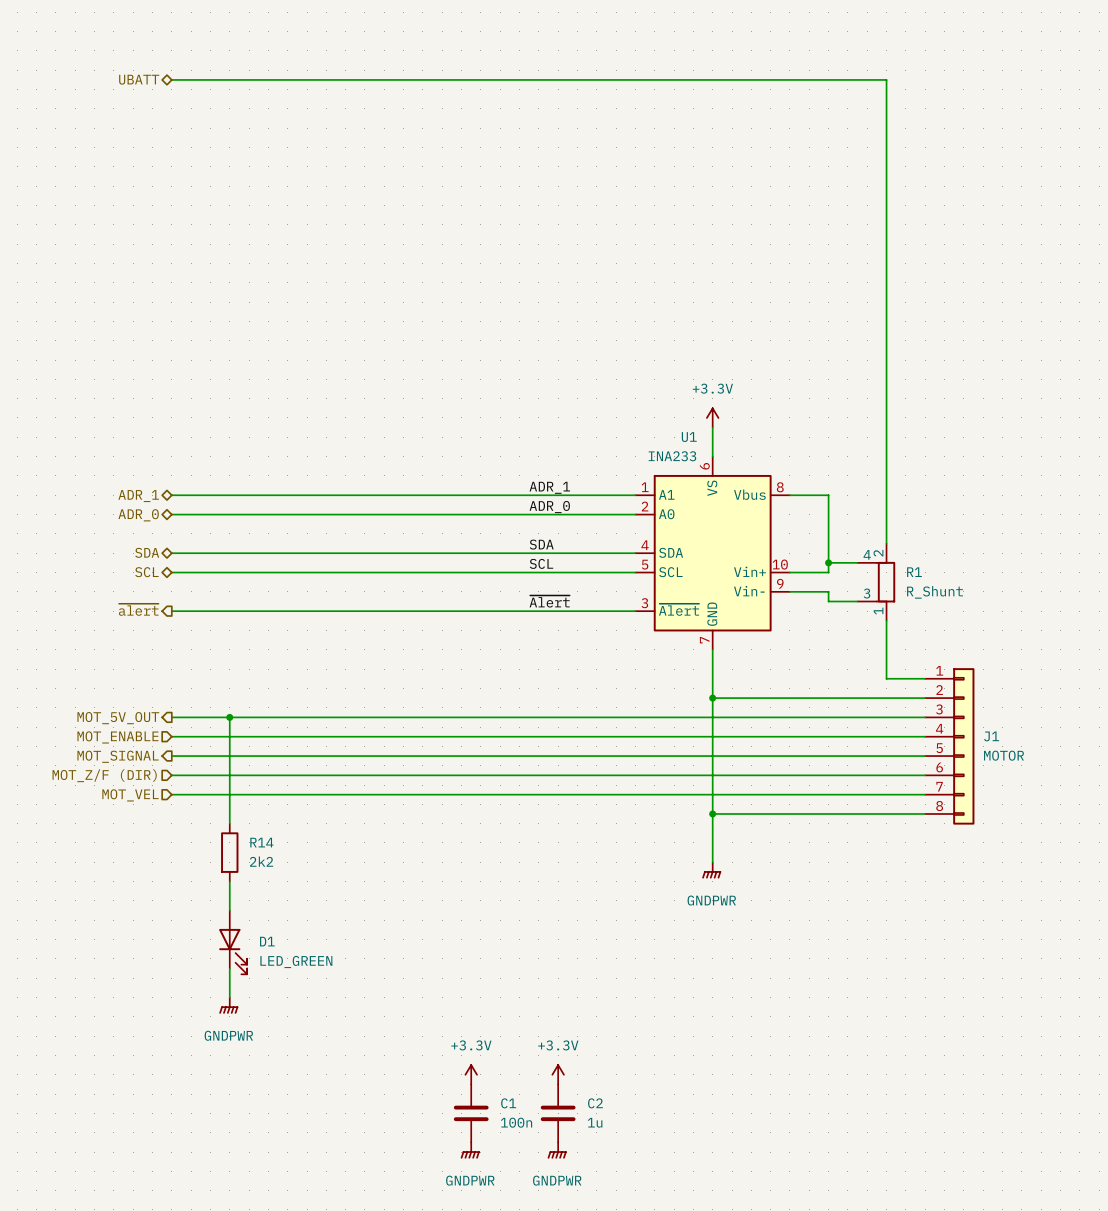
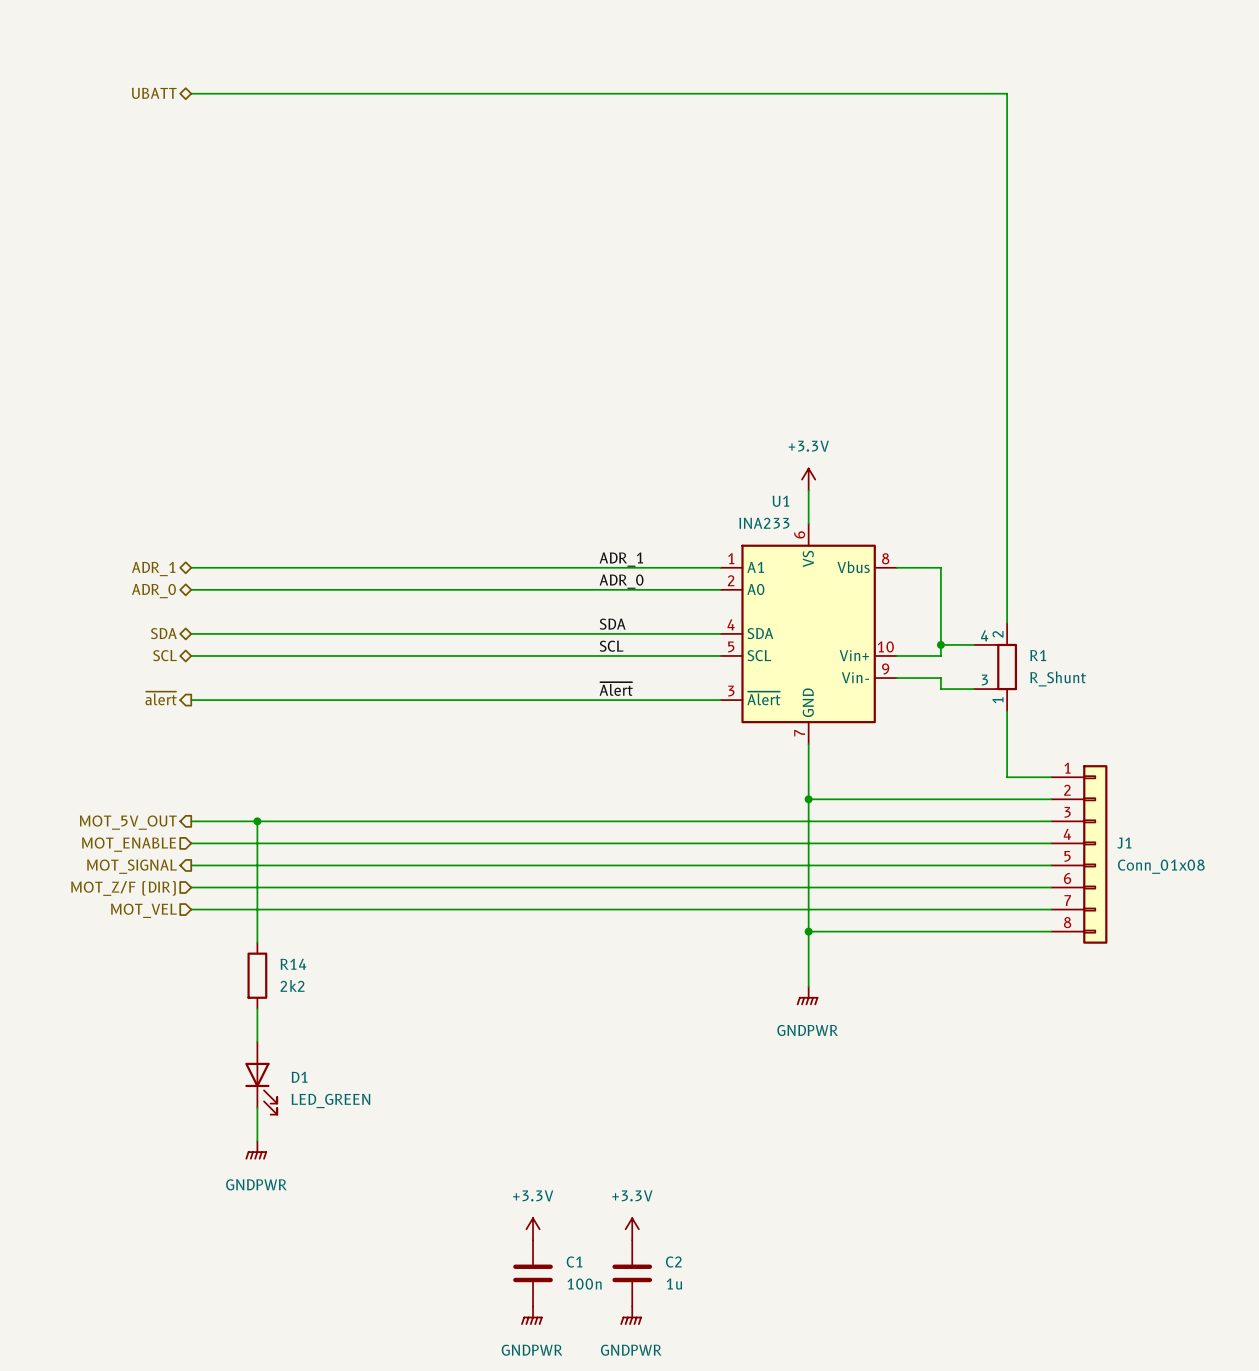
J1 value: MOTOR (1003, 755) -> Conn_01x08 (1161, 866)

